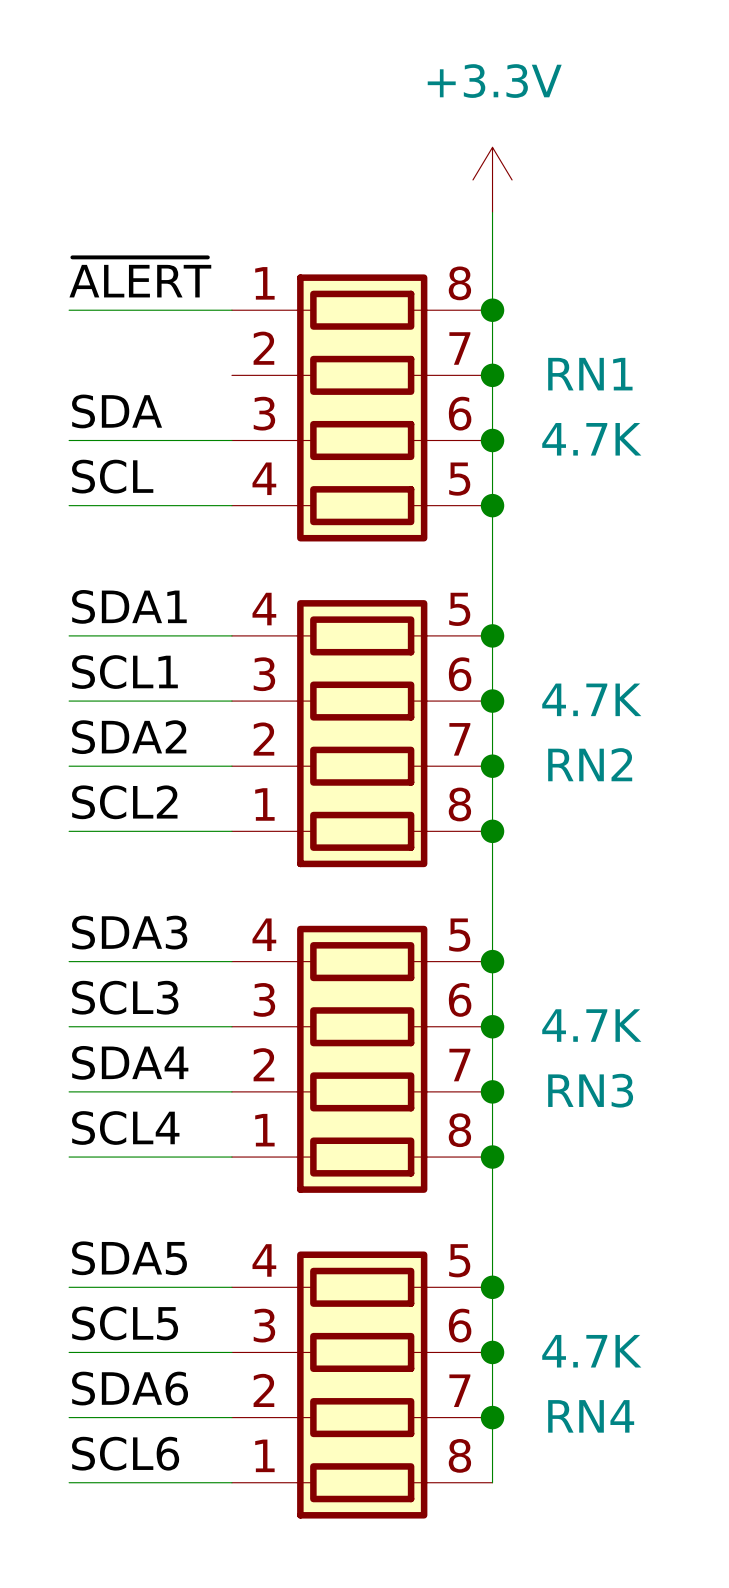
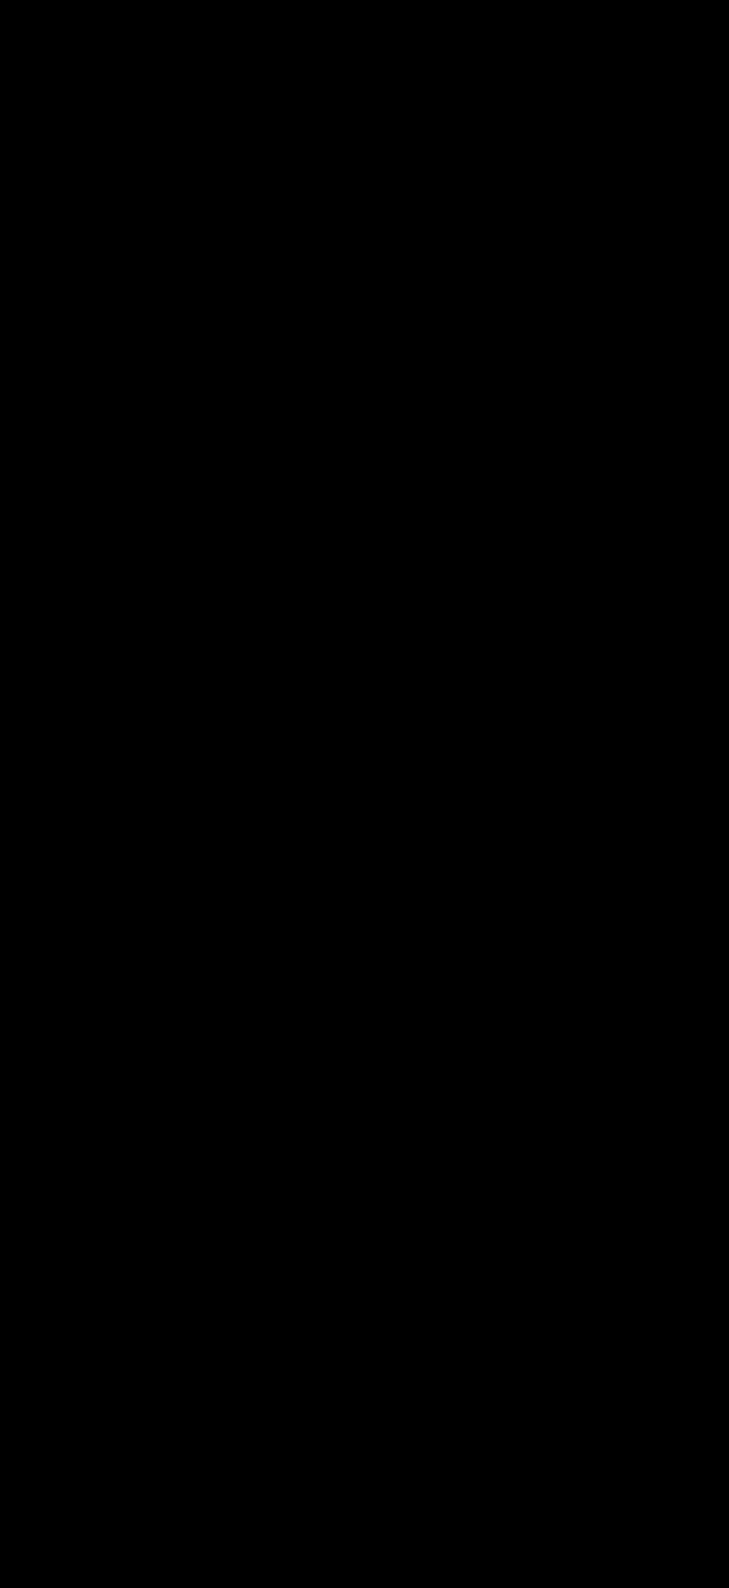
power symbol: +3.3V (492, 179) -> none
wire: (492, 212) (492, 1482) -> none
label: ~{ALERT} (140, 277) -> none
wire: (69, 310) (231, 310) -> none
junction: (492, 310) -> none
junction: (492, 375) -> none
RN1: 4.7K (362, 407) -> none
label: SDA (117, 411) -> none
wire: (69, 440) (231, 440) -> none
junction: (492, 440) -> none
label: SCL (112, 476) -> none
wire: (69, 505) (231, 505) -> none
junction: (492, 505) -> none
label: SDA1 (129, 606) -> none
wire: (69, 635) (231, 635) -> none
junction: (492, 635) -> none
label: SCL1 (124, 672) -> none
wire: (69, 701) (231, 701) -> none
junction: (492, 701) -> none
RN2: 4.7K (362, 733) -> none
label: SDA2 (129, 737) -> none
wire: (69, 766) (231, 766) -> none
junction: (492, 766) -> none
label: SCL2 (124, 802) -> none
wire: (69, 831) (231, 831) -> none
junction: (492, 831) -> none
label: SDA3 (129, 932) -> none
wire: (69, 961) (231, 961) -> none
junction: (492, 961) -> none
label: SCL3 (125, 997) -> none
wire: (69, 1026) (231, 1026) -> none
junction: (492, 1026) -> none
RN3: 4.7K (362, 1059) -> none
label: SDA4 (130, 1062) -> none
wire: (69, 1091) (231, 1091) -> none
junction: (492, 1091) -> none
label: SCL4 (125, 1127) -> none
wire: (69, 1157) (231, 1157) -> none
junction: (492, 1157) -> none
label: SDA5 (129, 1258) -> none
wire: (69, 1287) (231, 1287) -> none
junction: (492, 1287) -> none
label: SCL5 (125, 1323) -> none
wire: (69, 1352) (231, 1352) -> none
junction: (492, 1352) -> none
RN4: 4.7K (362, 1385) -> none
label: SDA6 (130, 1388) -> none
wire: (69, 1417) (231, 1417) -> none
junction: (492, 1417) -> none
label: SCL6 (125, 1453) -> none
wire: (69, 1482) (231, 1482) -> none

